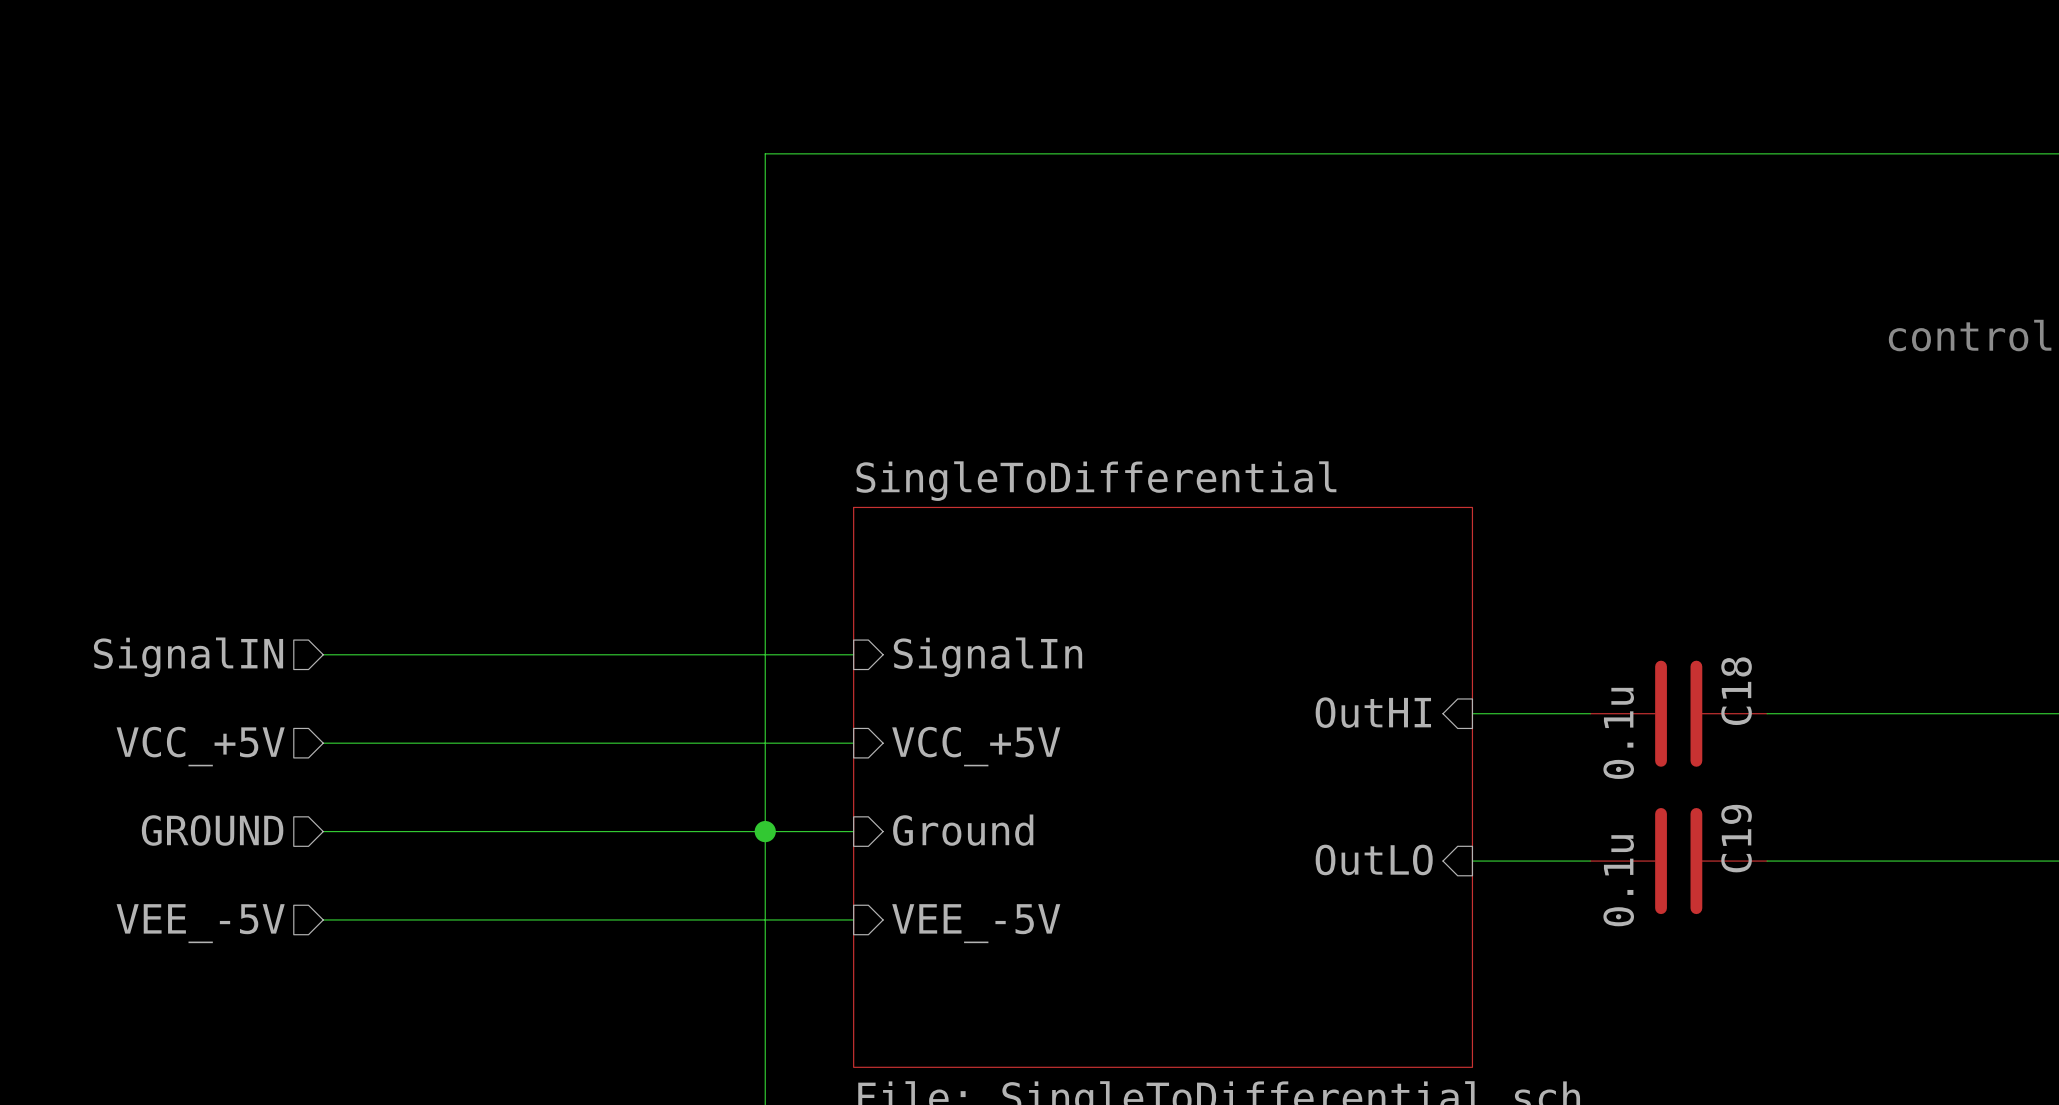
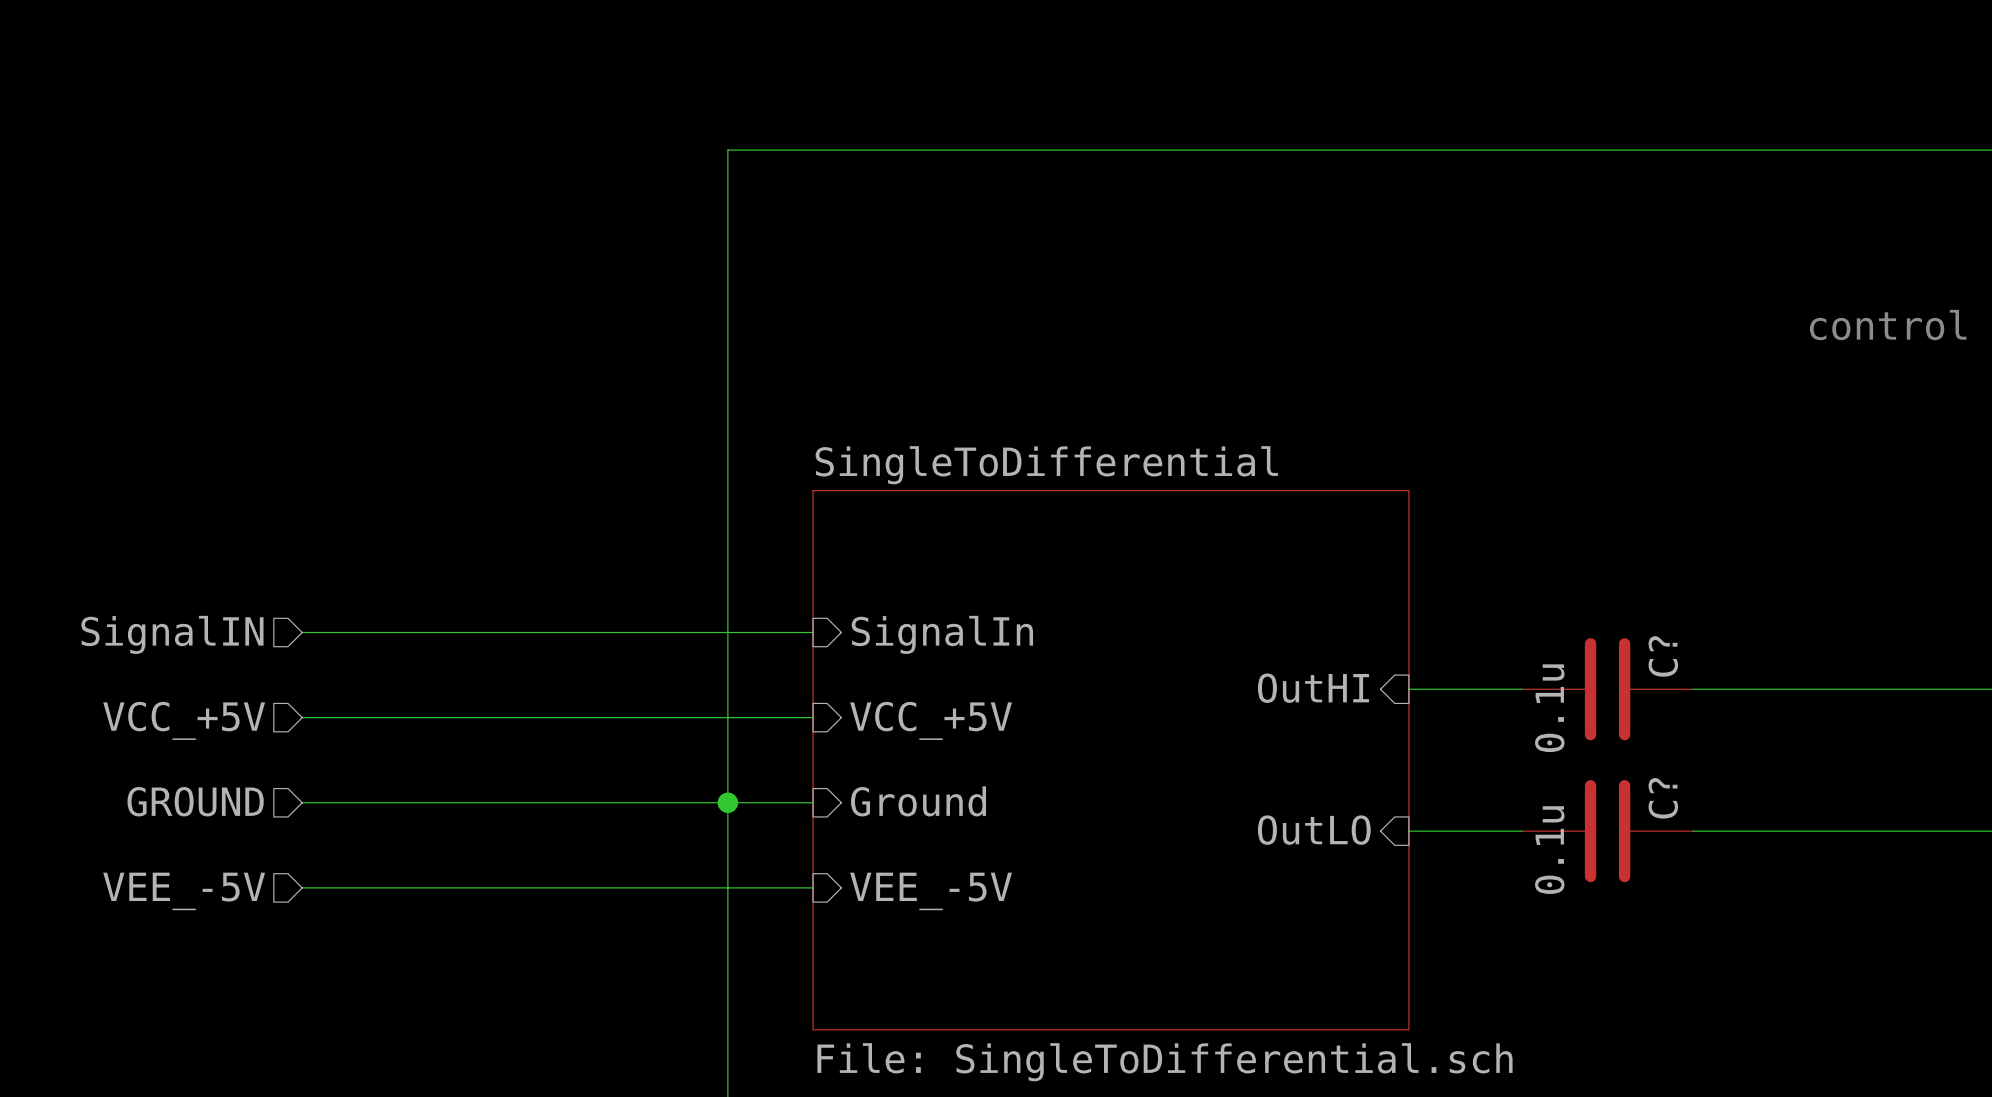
C18 name: C18 (1736, 691) -> C? (1663, 656)
C19 name: C19 (1736, 838) -> C? (1663, 798)

